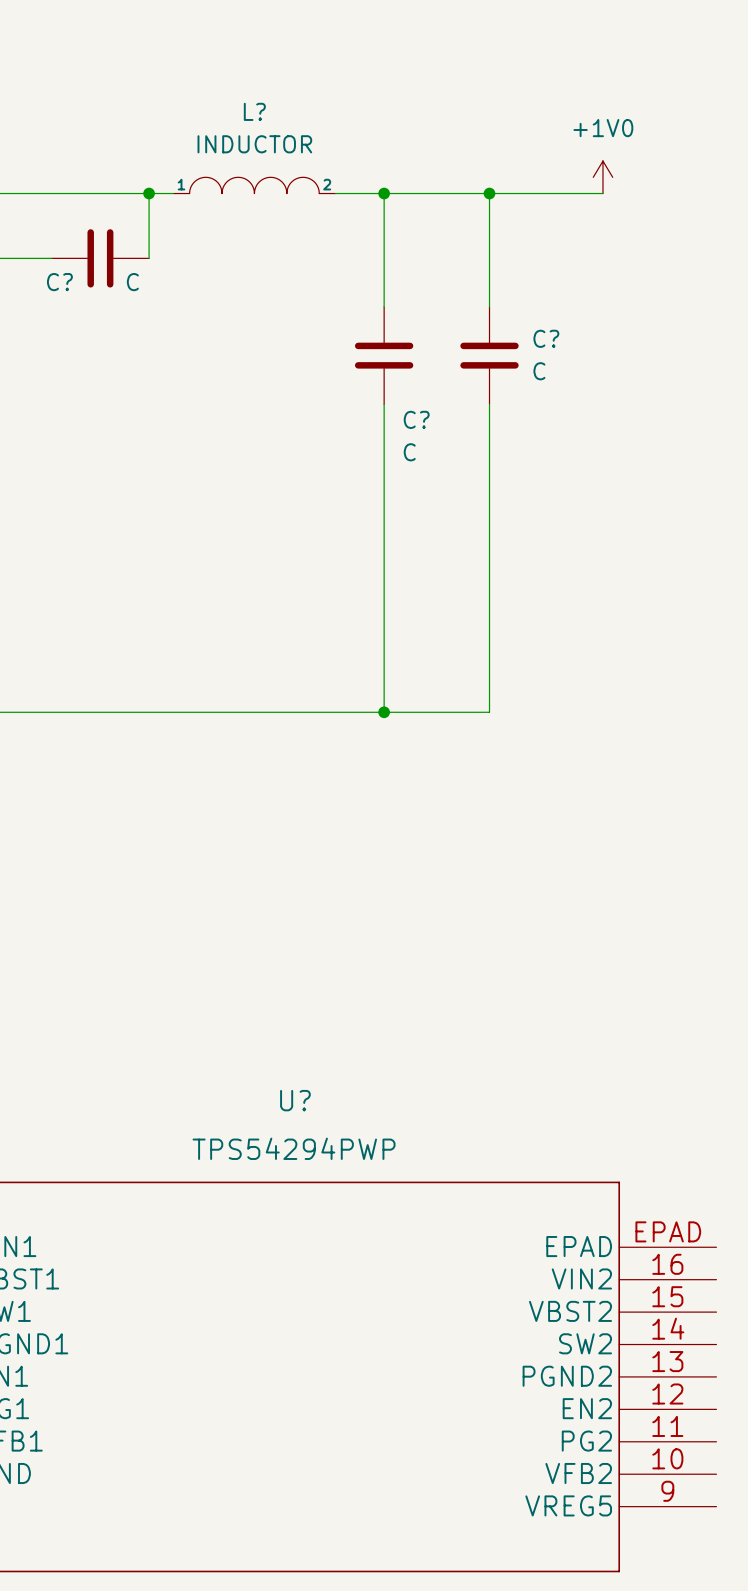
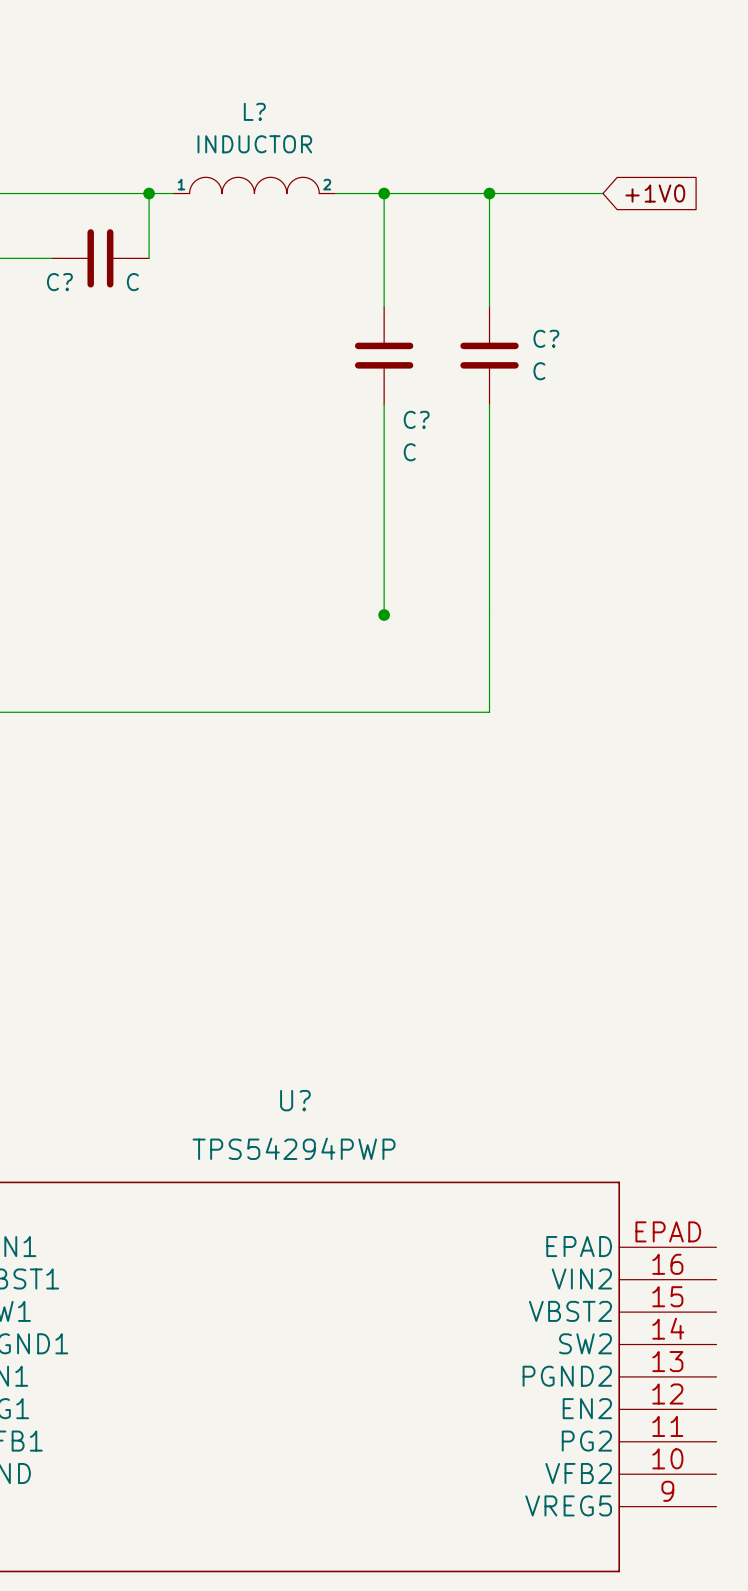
power symbol: +1V0 (602, 177) -> none
global label: none -> +1V0 (655, 193)
wire: (384, 615) (384, 712) -> none
junction: none -> (384, 615)
junction: (384, 712) -> none

